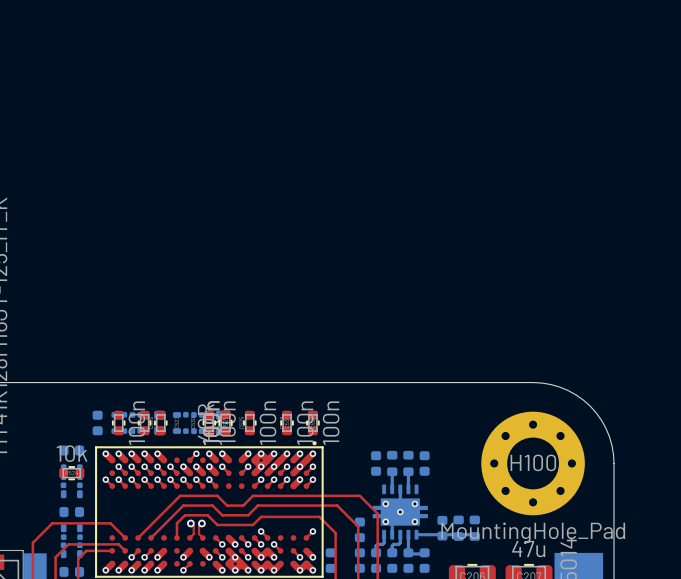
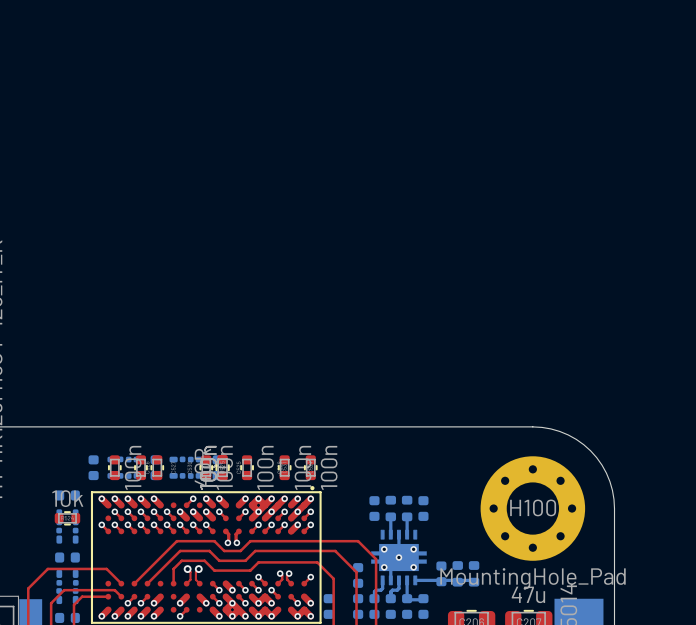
top track: none -> (225, 531) (228, 534) (227, 542)
top track: none -> (238, 531) (236, 534) (236, 542)
via: none -> (227, 542)
via: none -> (236, 542)
top track: none -> (280, 573) (282, 579) (278, 583)
via: none -> (280, 573)
top track: none -> (289, 573) (287, 579) (291, 583)
via: none -> (289, 573)

